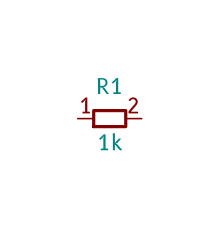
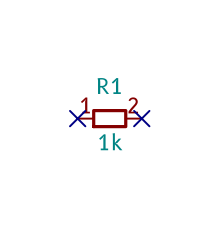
no-connect mark: none -> (77, 118)
no-connect mark: none -> (141, 118)

